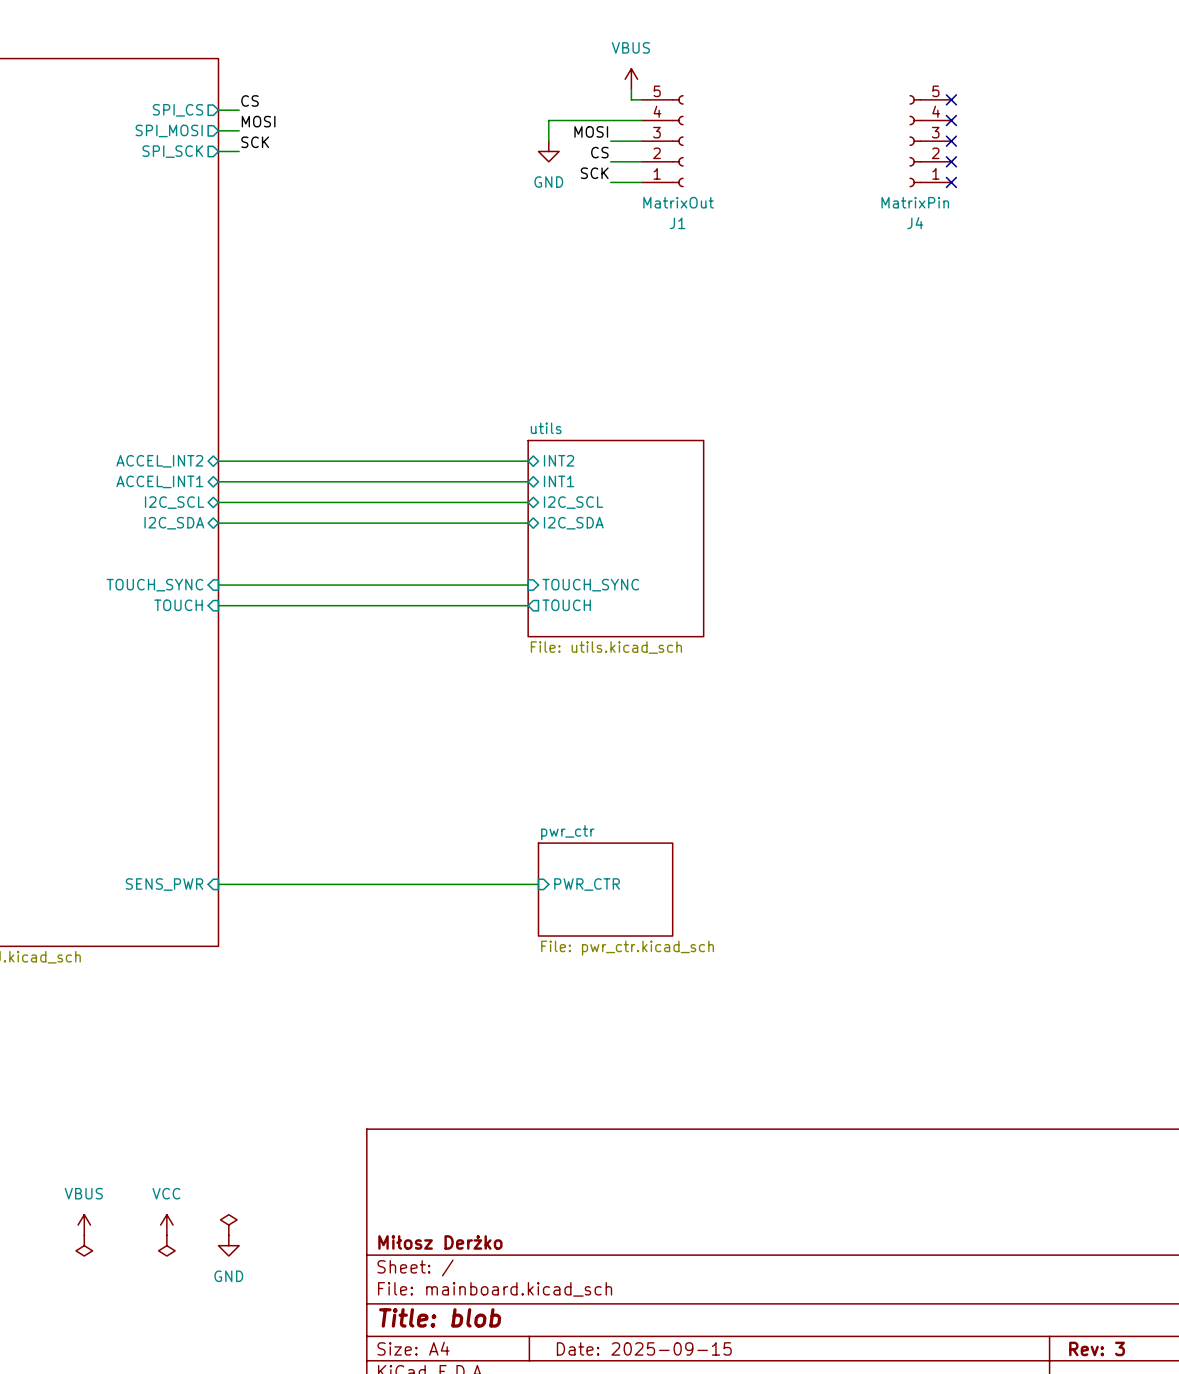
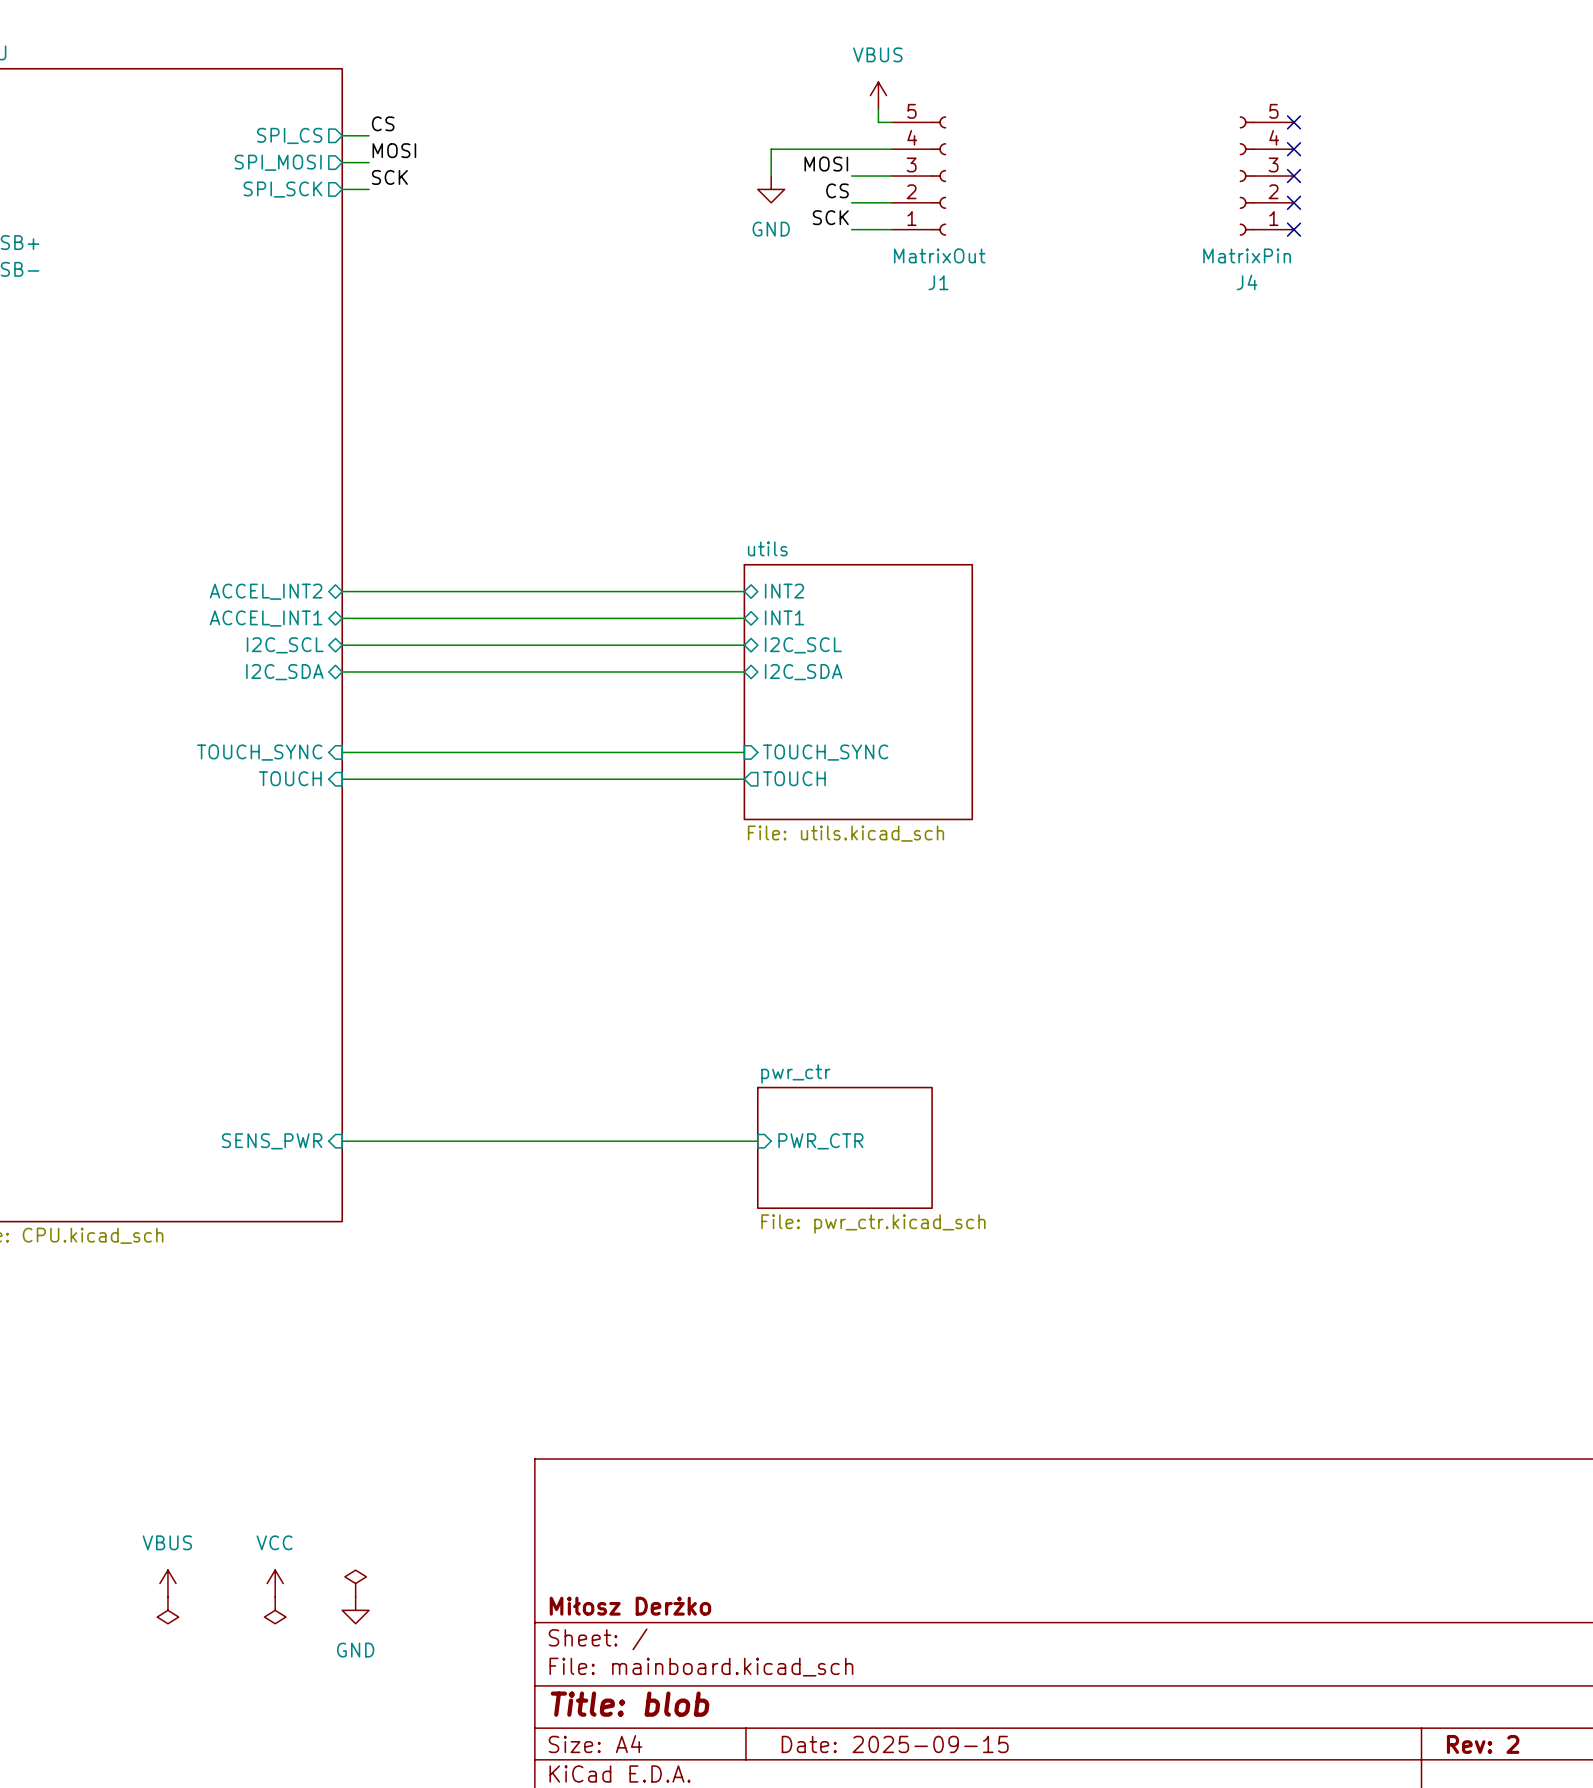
title block: Rev: 3 (1097, 1348) -> Rev: 2 (1483, 1744)

